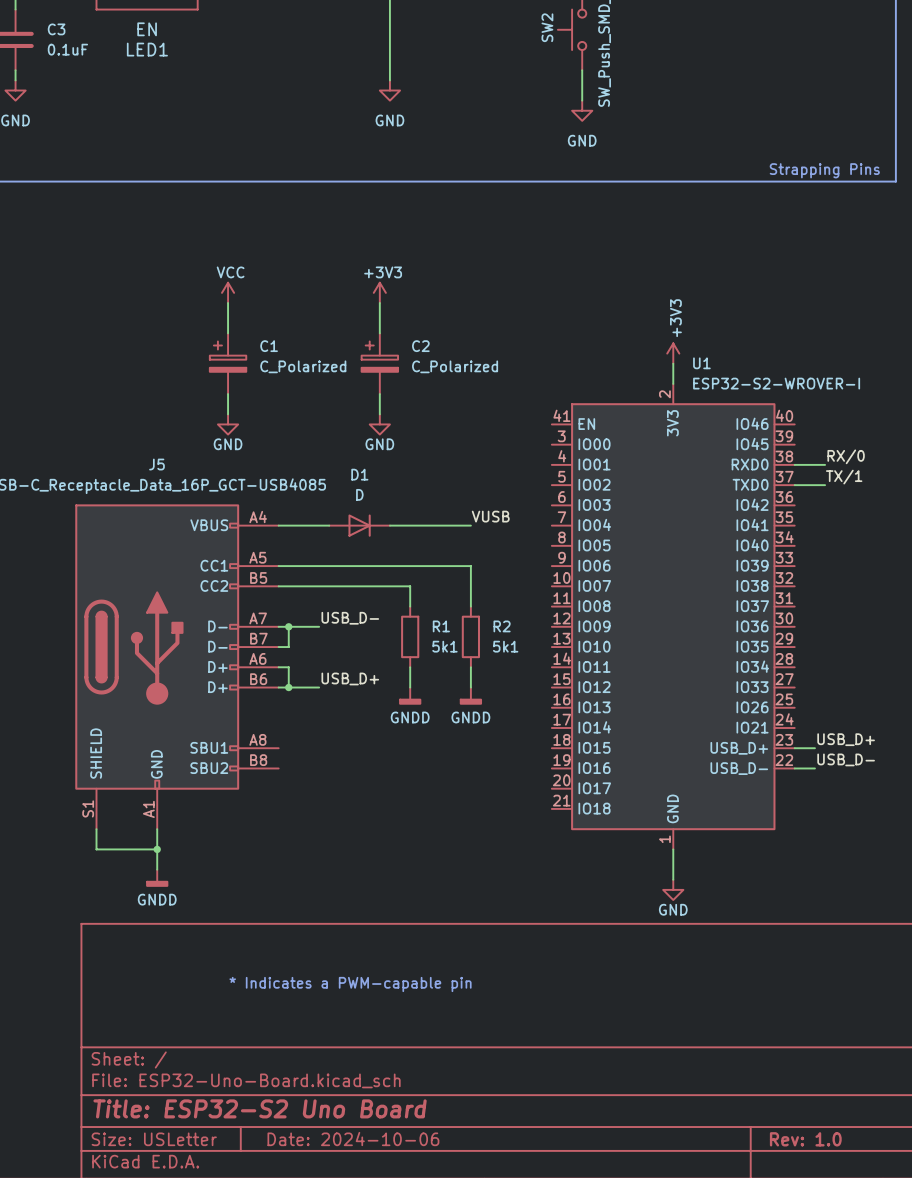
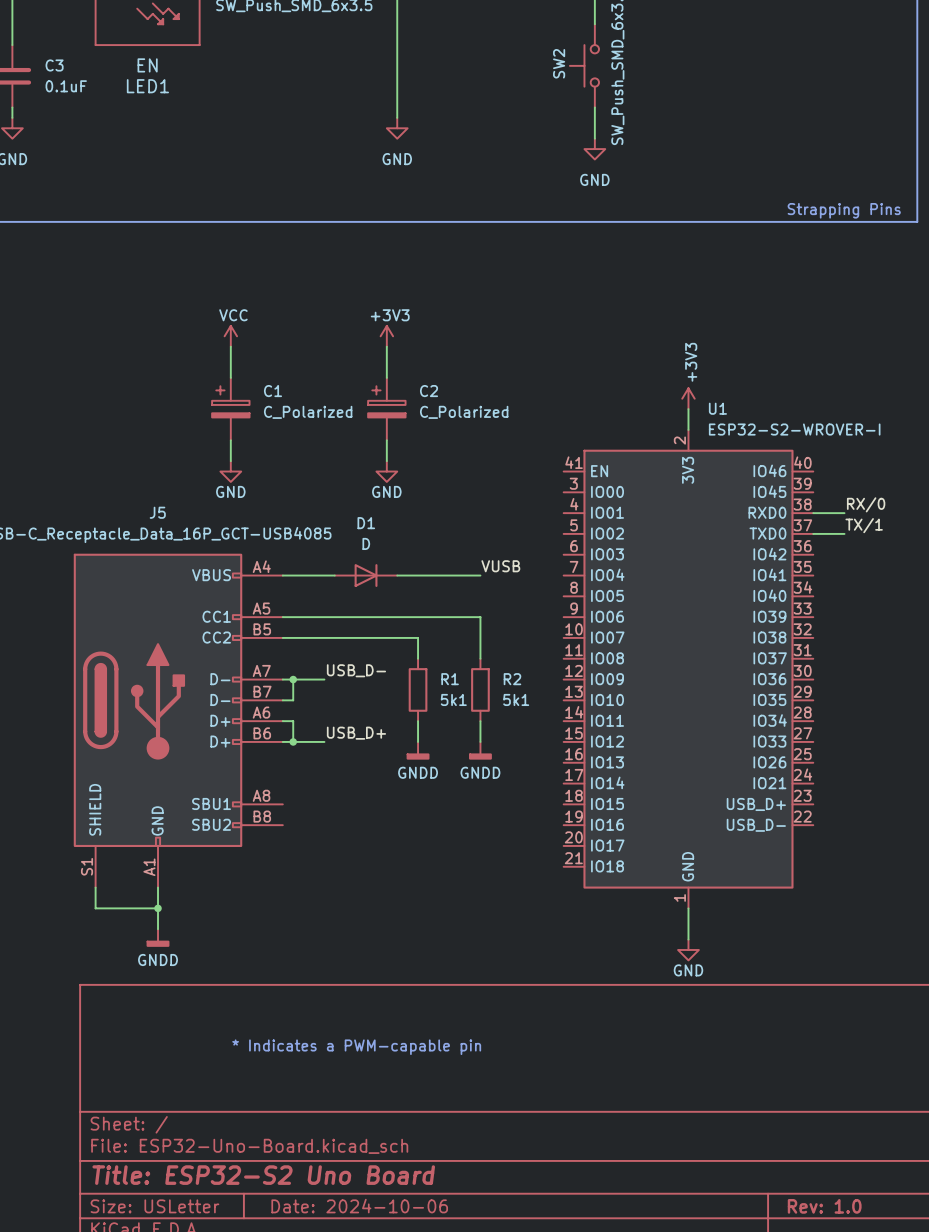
label: USB_D+ (846, 739) -> none
wire: (794, 748) (814, 748) -> none
label: USB_D- (846, 759) -> none
wire: (794, 768) (814, 768) -> none

